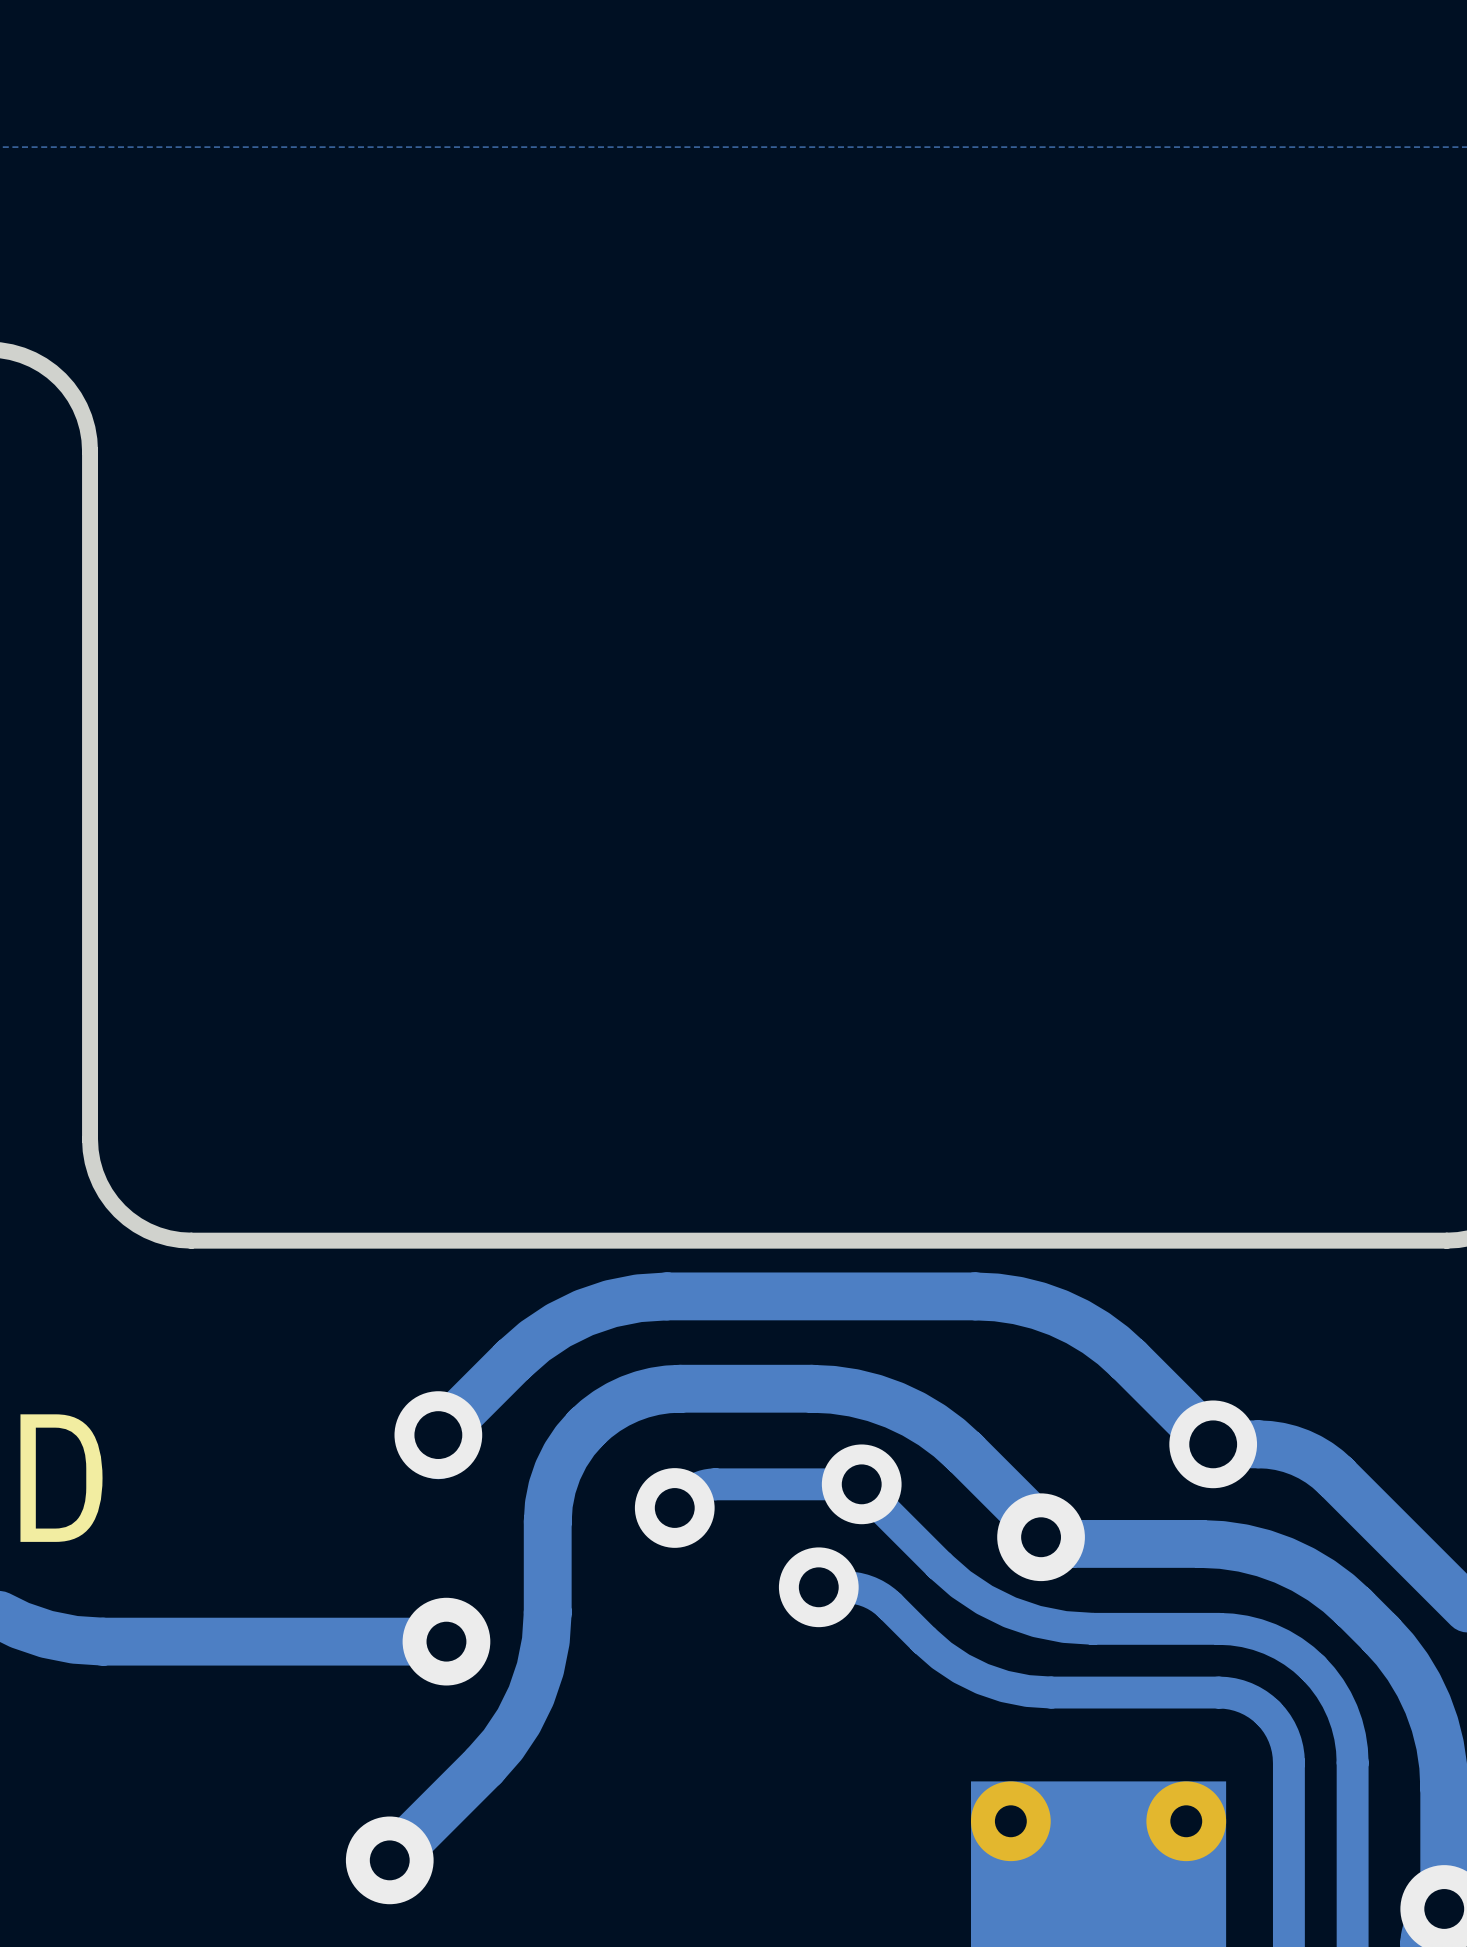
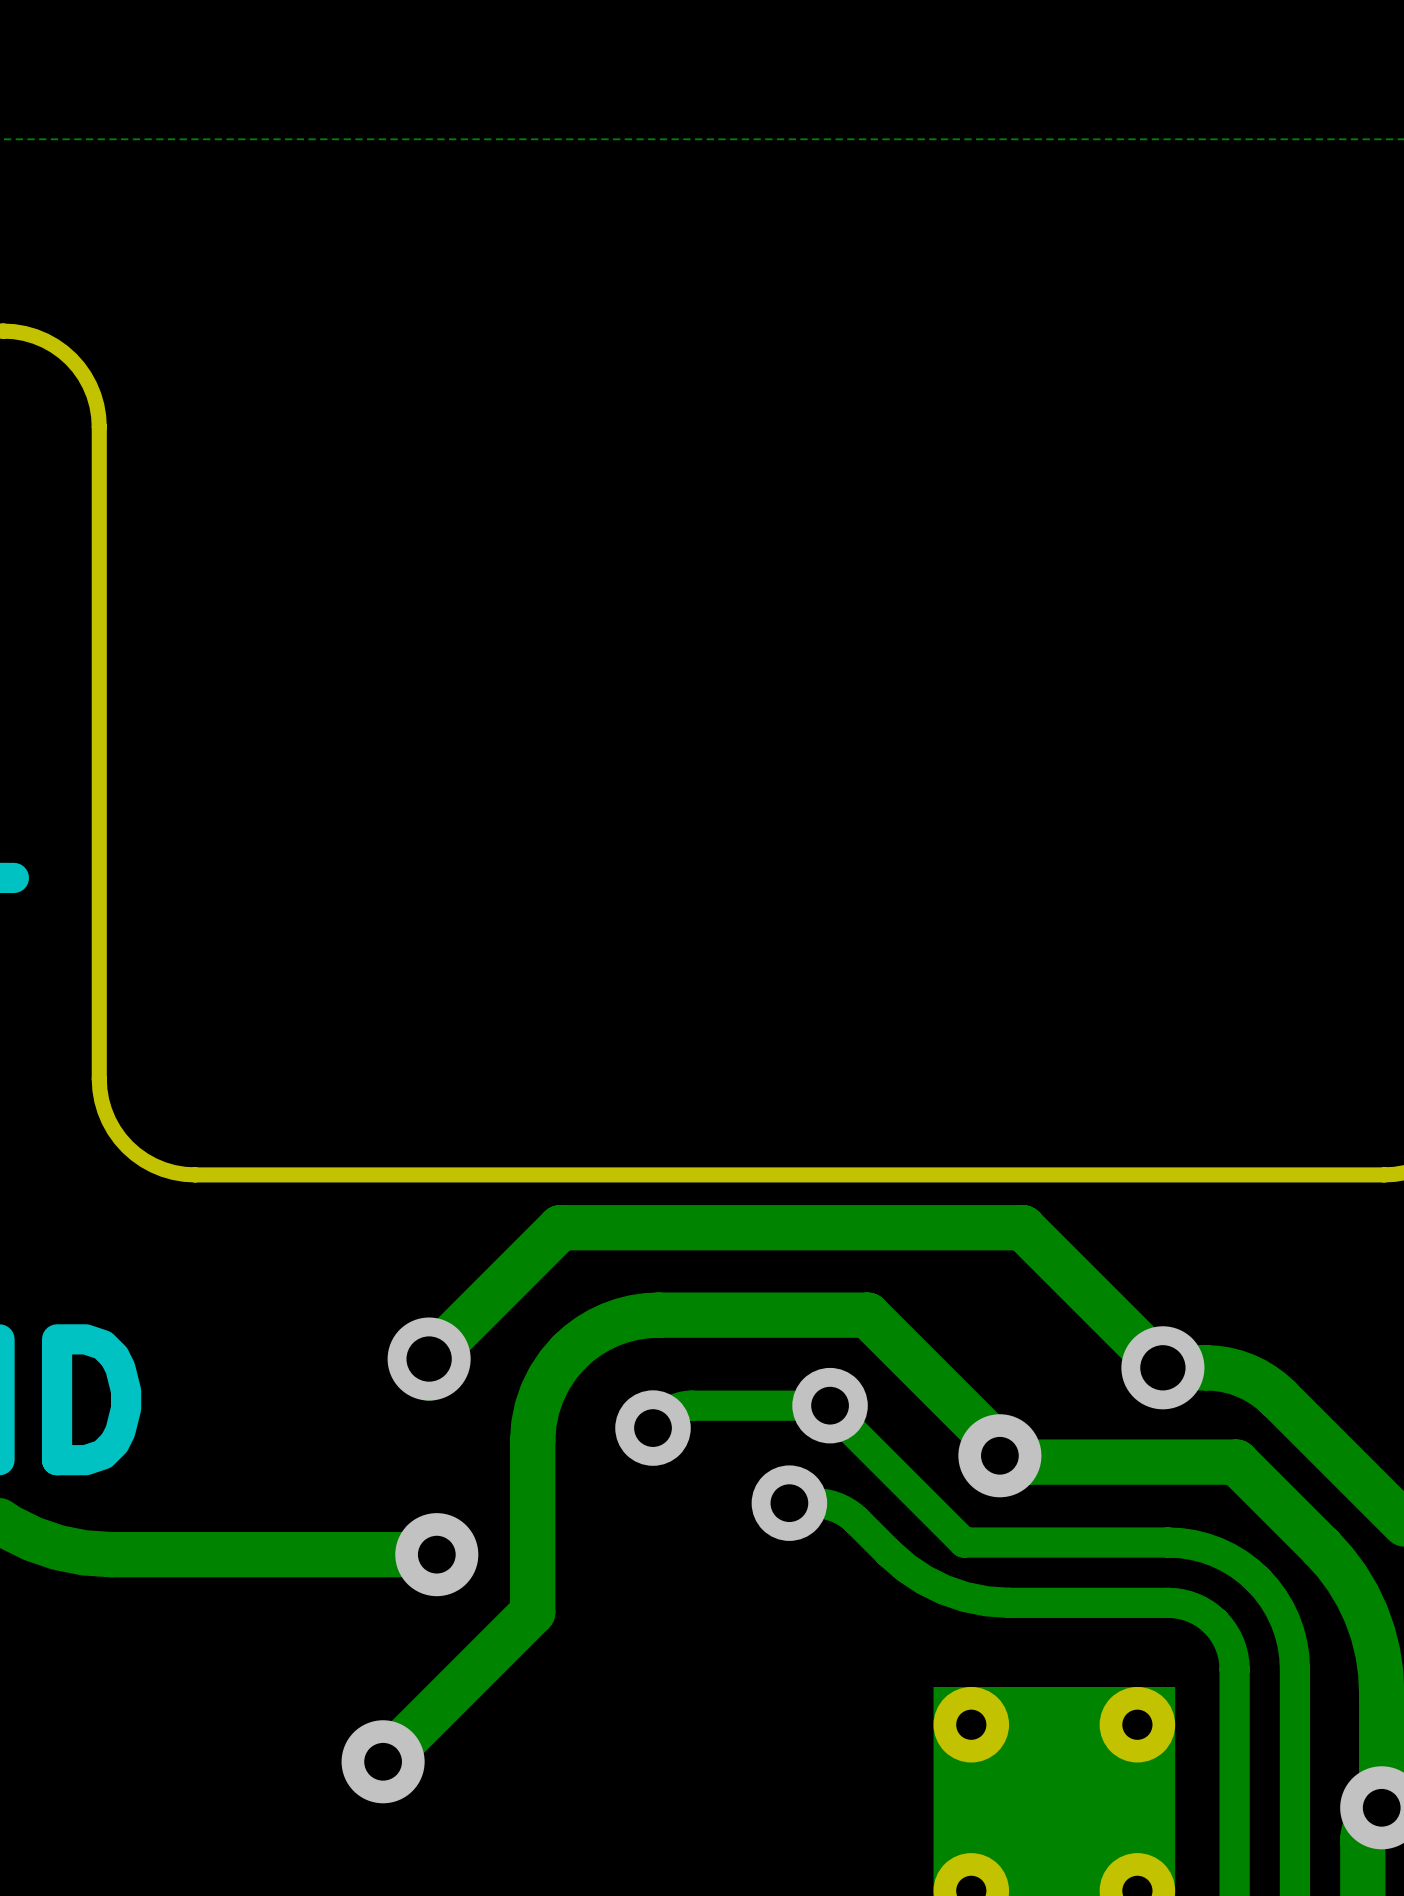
track: (666, 1296) (638, 1298) (610, 1303) (583, 1312) (558, 1325) (534, 1341) (513, 1359) -> (645, 1227) (560, 1227) (500, 1287)
track: (975, 1296) (1017, 1300) (1058, 1312) (1095, 1332) (1128, 1359) -> (937, 1227) (1022, 1227) (1082, 1287)
track: (811, 1388) (853, 1392) (894, 1405) (931, 1425) (964, 1452) -> (782, 1315) (867, 1315) (927, 1375)
track: (1200, 1543) (1243, 1548) (1283, 1560) (1321, 1580) (1354, 1607) -> (1151, 1462) (1236, 1462) (1296, 1522)
track: (939, 1565) (960, 1584) (984, 1599) (1009, 1612) (1036, 1621) (1064, 1626) (1092, 1628) -> (903, 1482) (963, 1542) (1049, 1542)
track: (547, 1612) (545, 1640) (540, 1668) (531, 1695) (518, 1721) (502, 1744) (484, 1765) -> (532, 1527) (532, 1612) (472, 1672)

